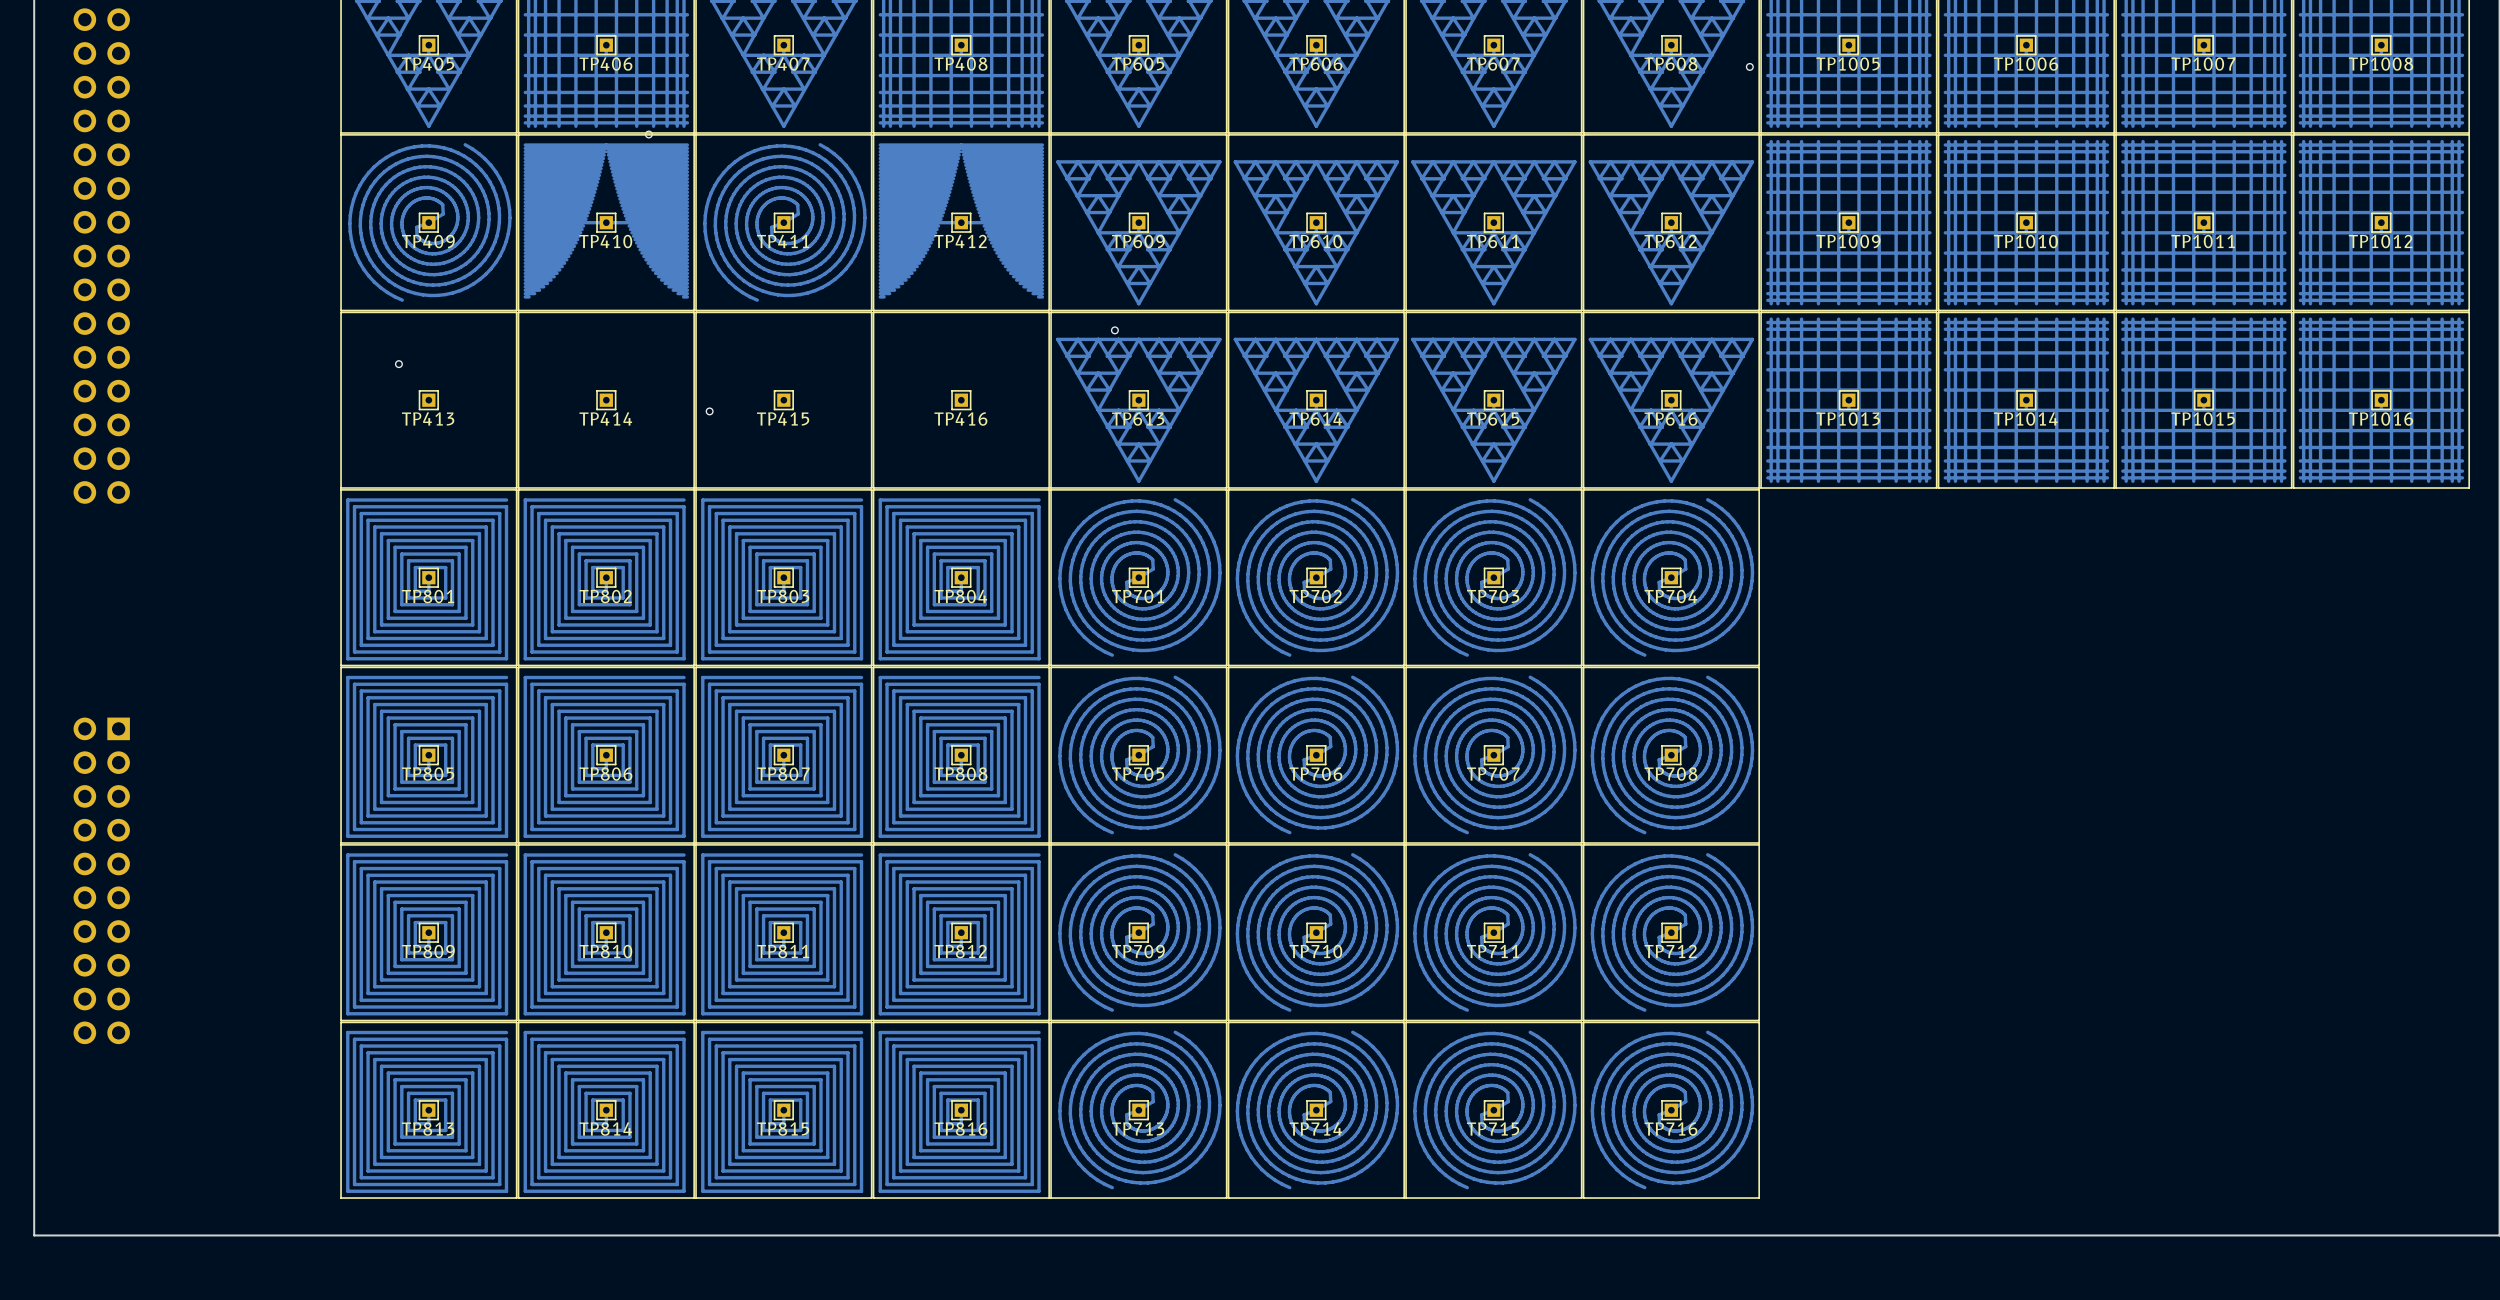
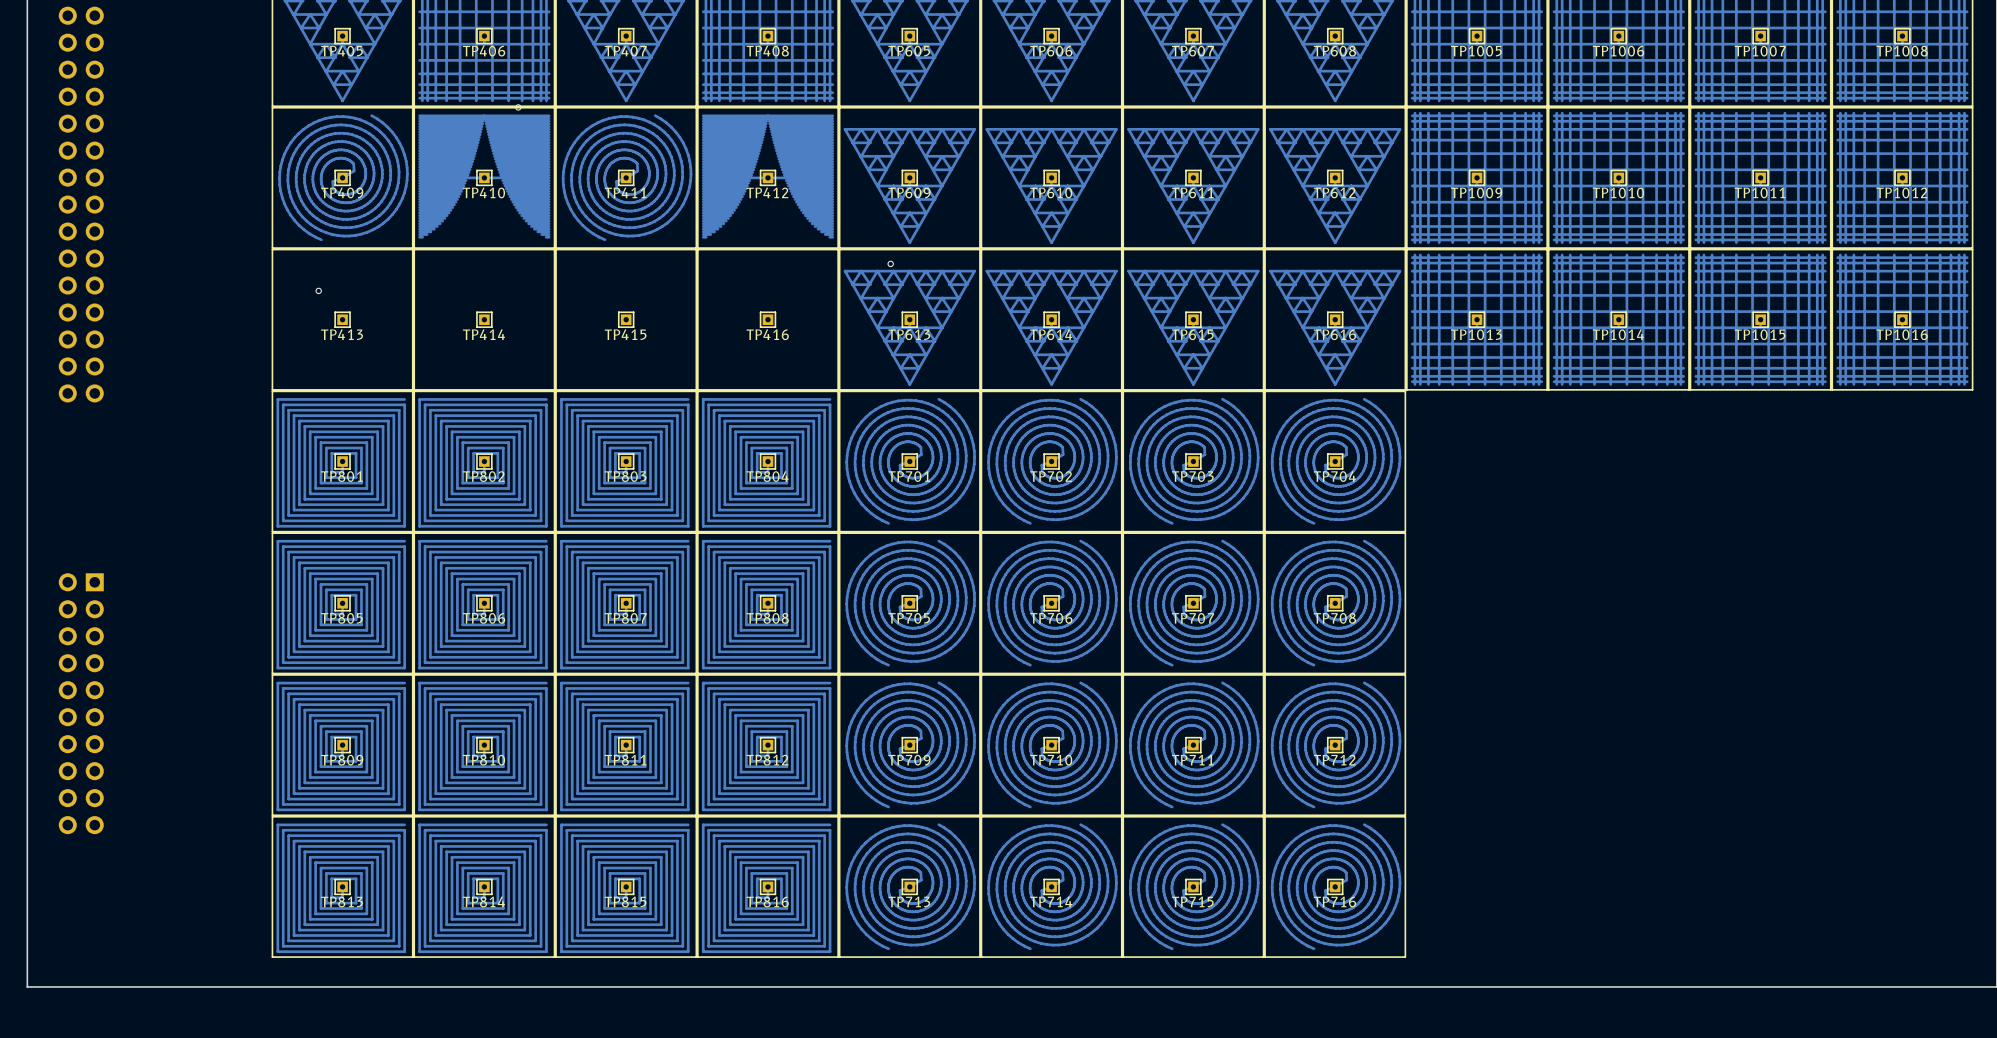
via: (1749, 66) -> none
via: (709, 411) -> none

